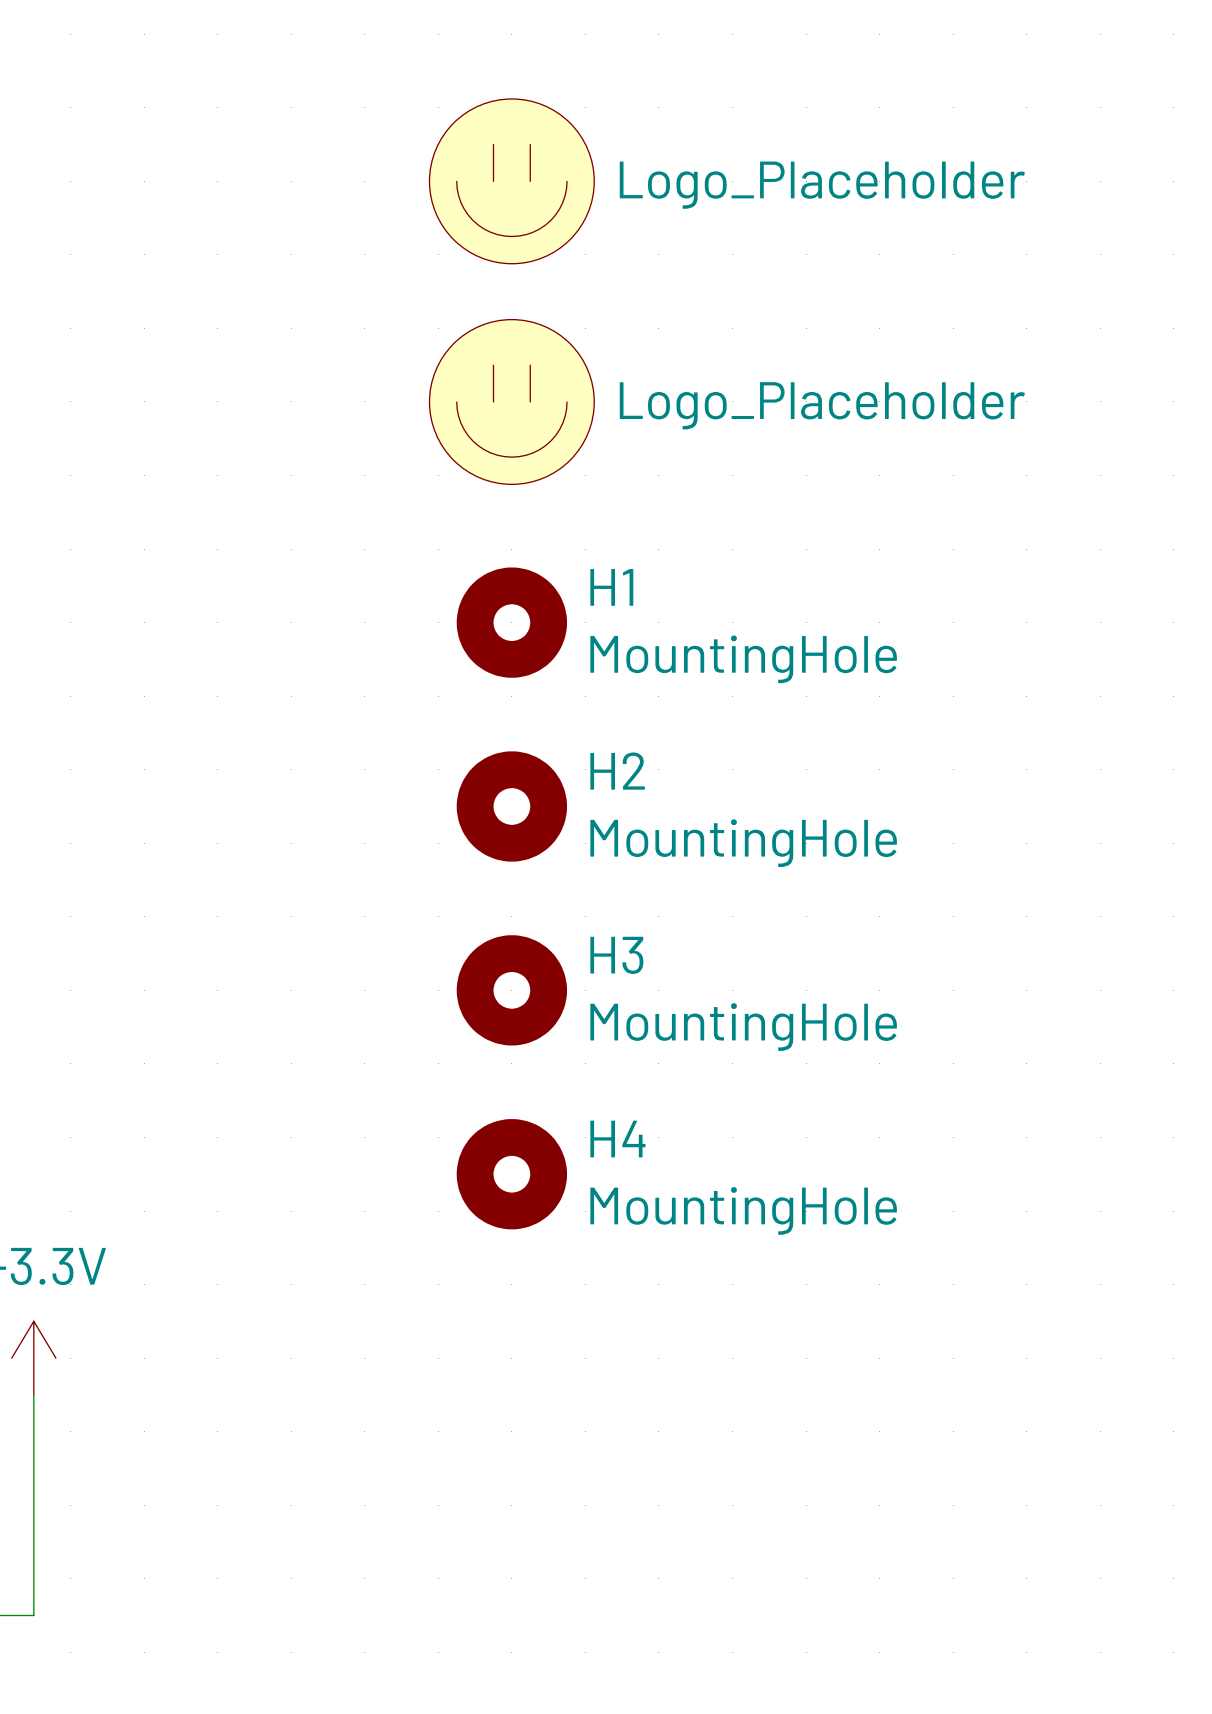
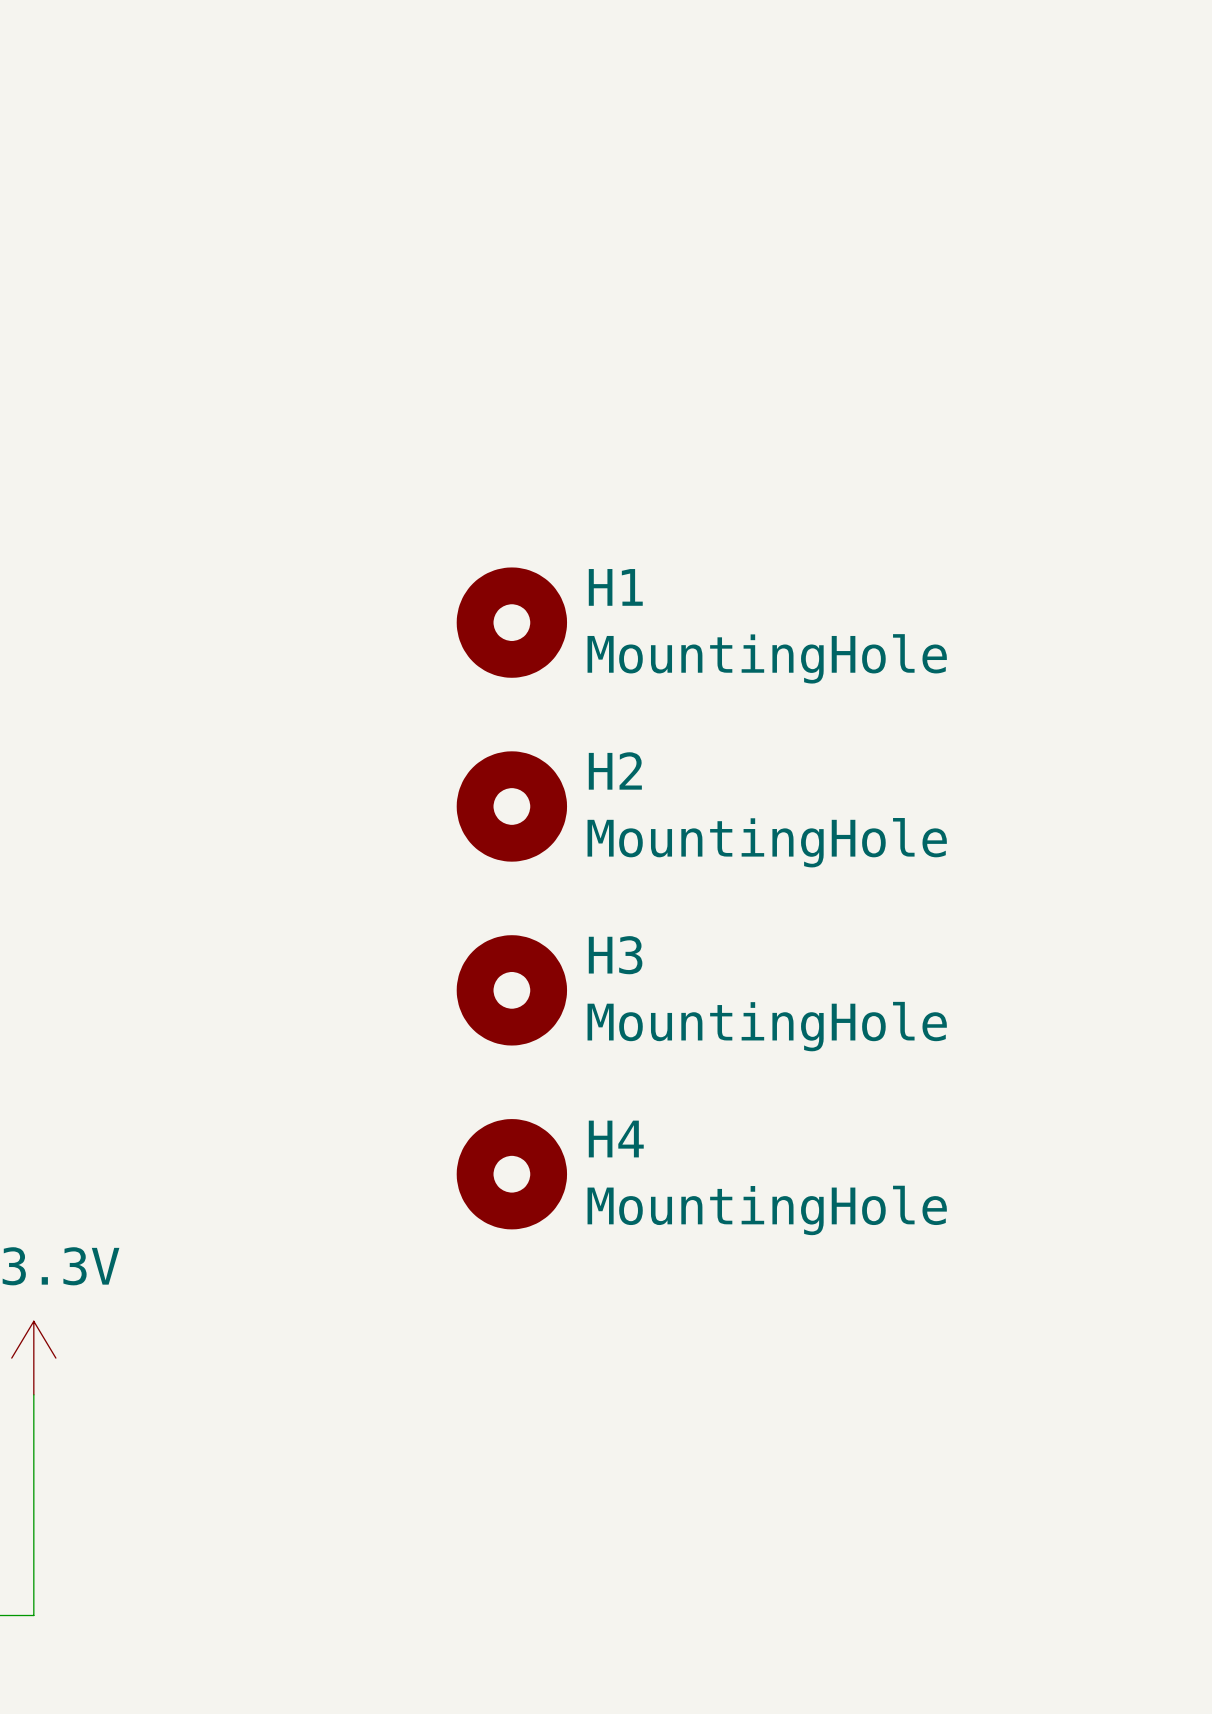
part: Logo_Placeholder (511, 181) -> none
part: Logo_Placeholder (511, 401) -> none

